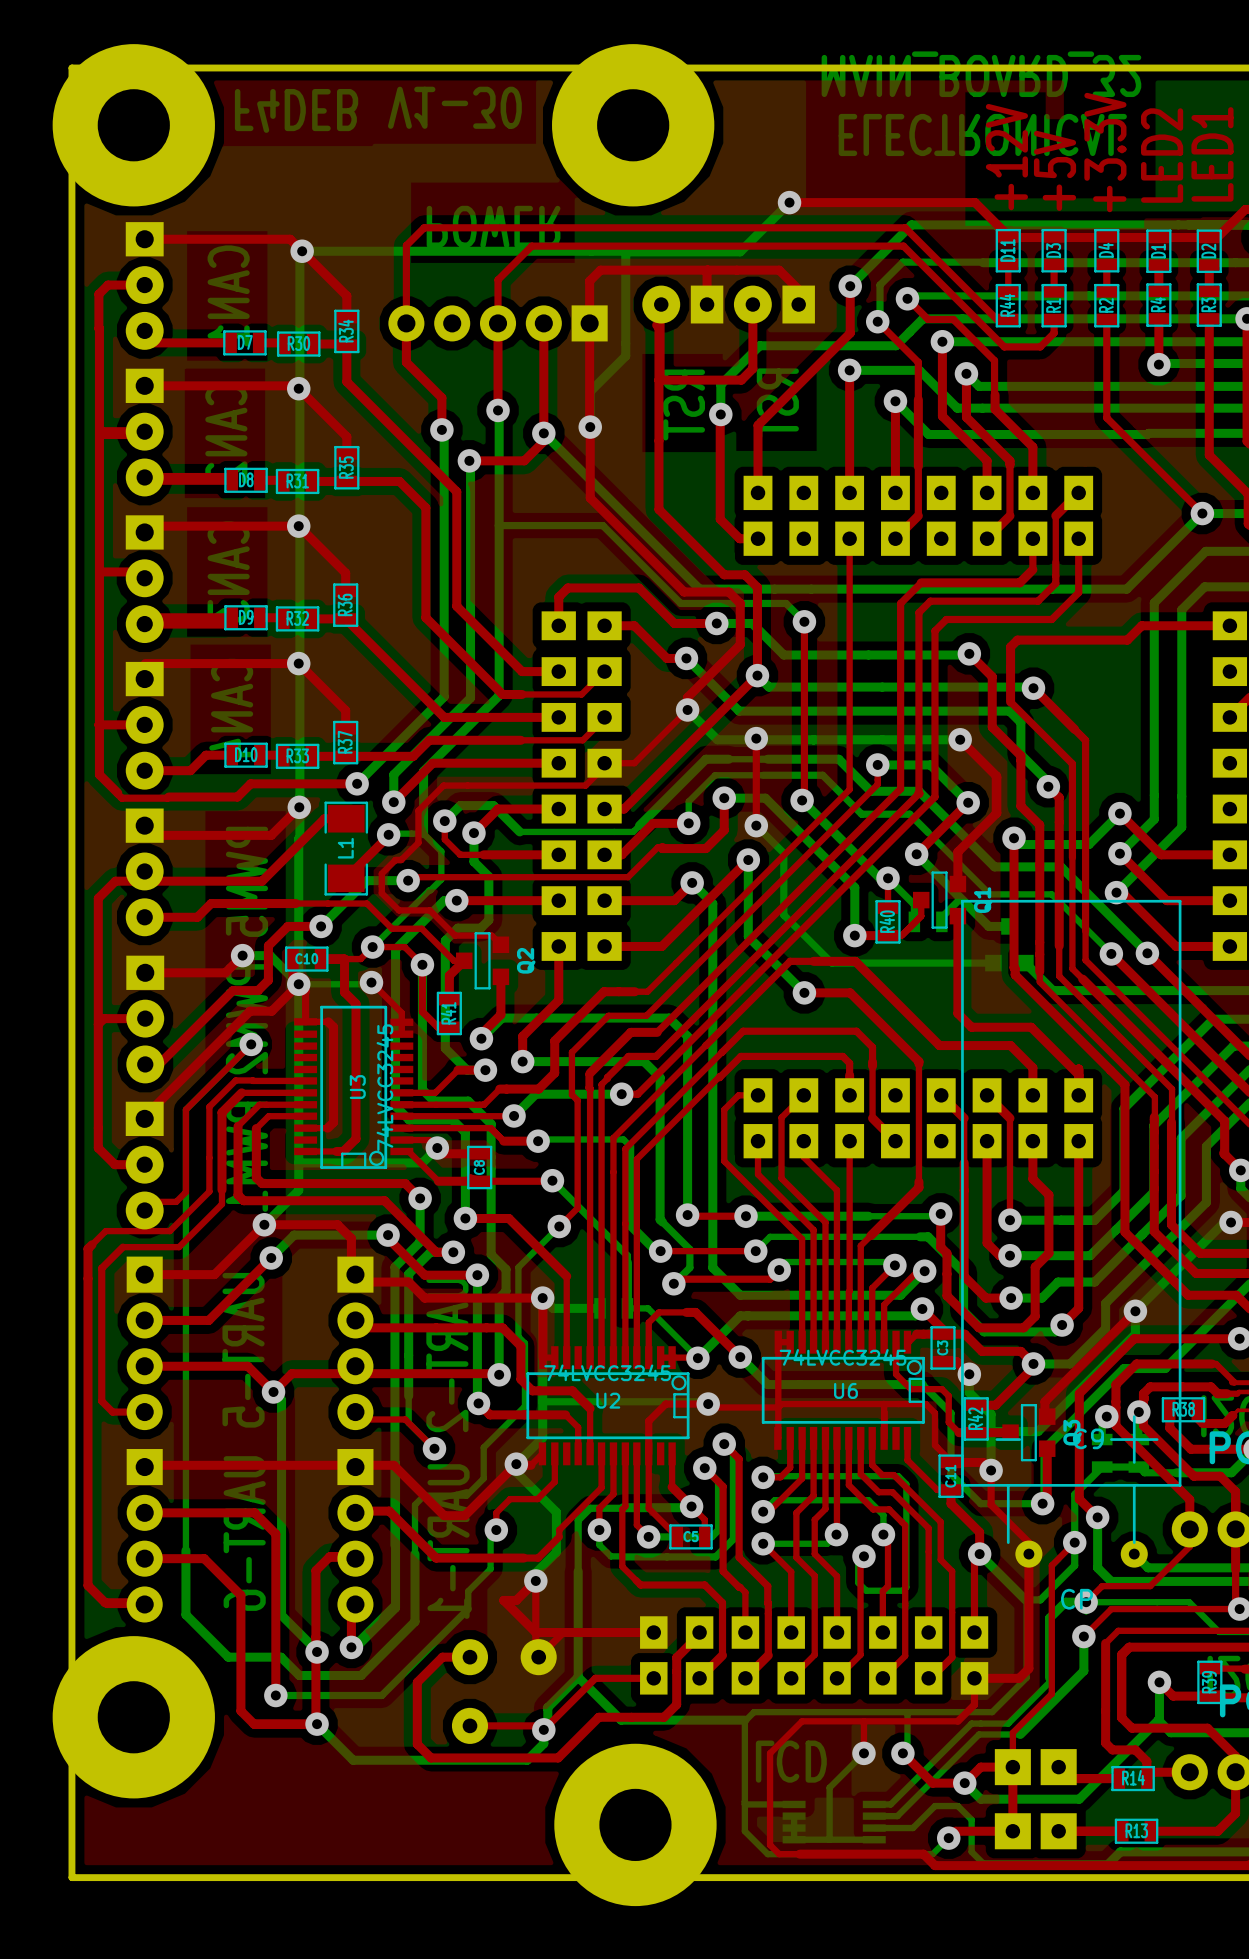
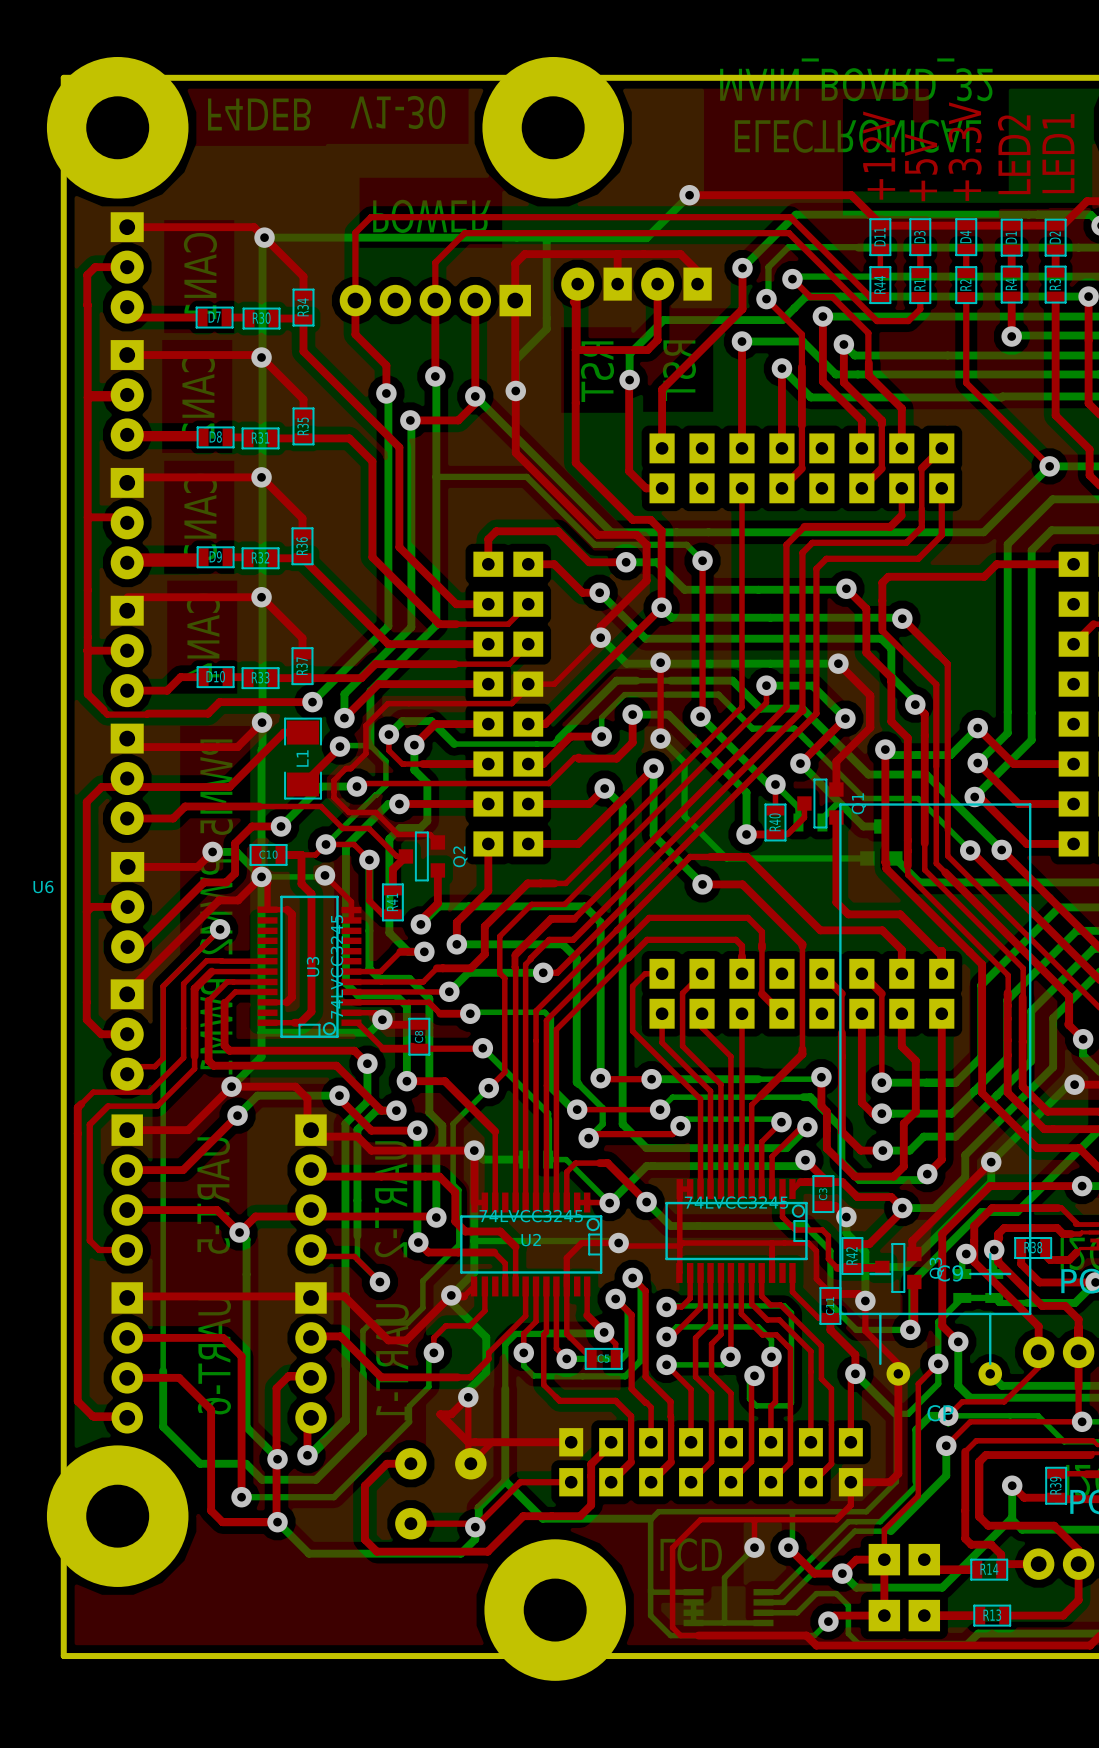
U6 name position: U6 (845, 1390) -> U6 (43, 886)

